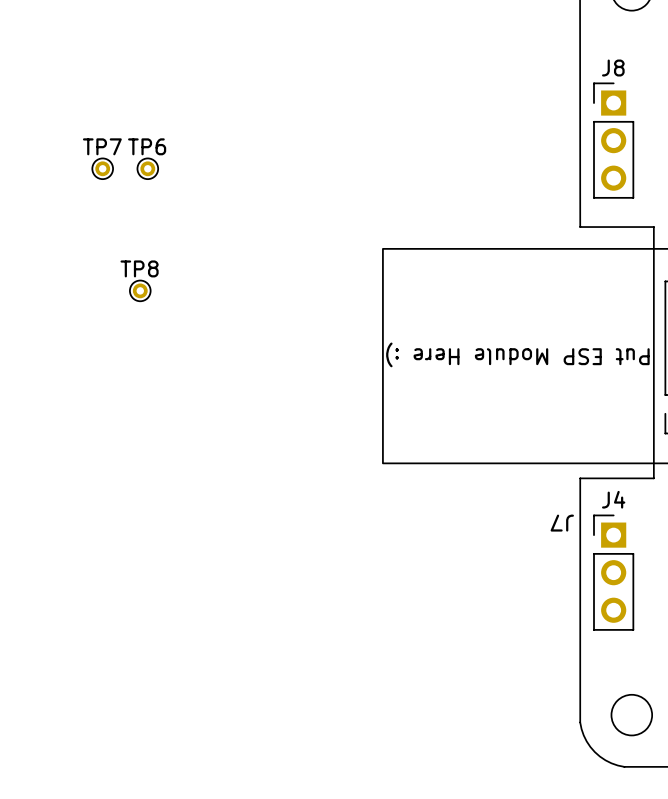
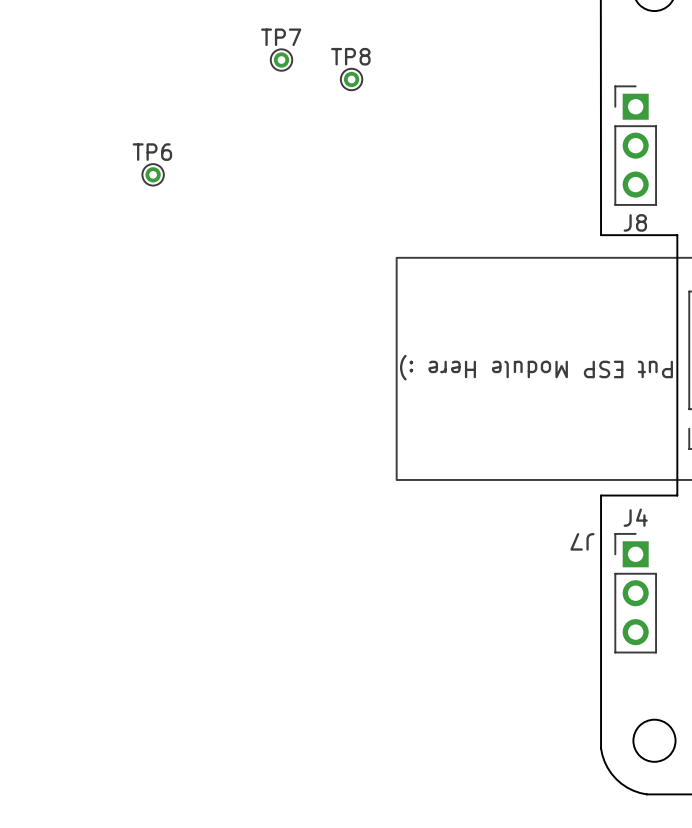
J8 name position: J8 (613, 68) -> J8 (635, 222)
TP7 position: (102, 168) -> (281, 60)
TP8 position: (140, 290) -> (351, 79)

